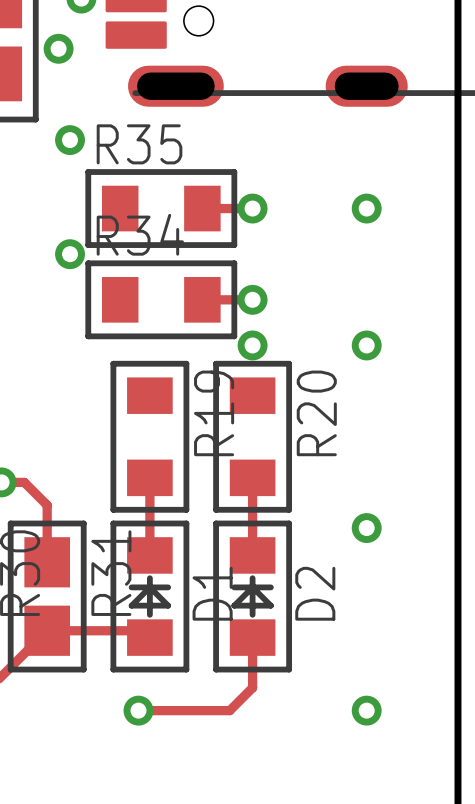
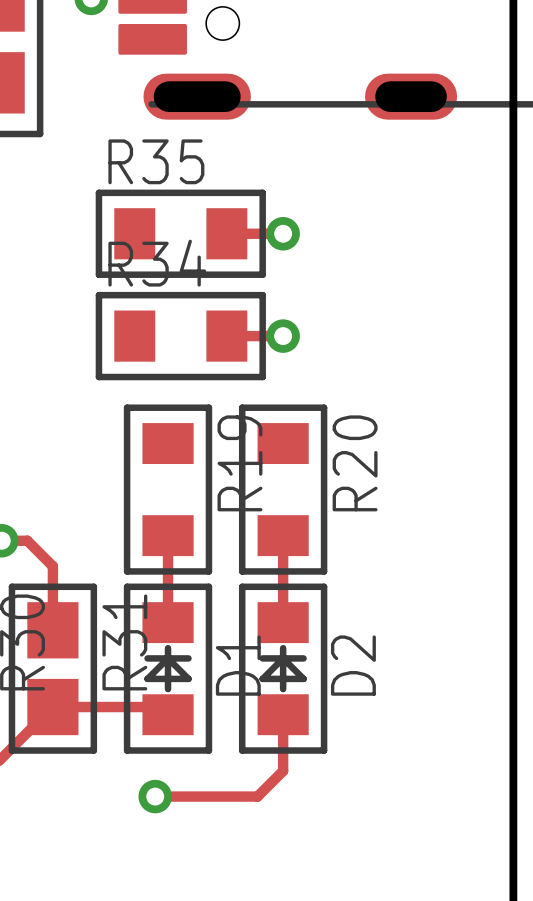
via: (58, 48) -> none
via: (70, 140) -> none
via: (366, 208) -> none
via: (70, 254) -> none
via: (252, 345) -> none
via: (366, 345) -> none
via: (366, 528) -> none
via: (366, 710) -> none

